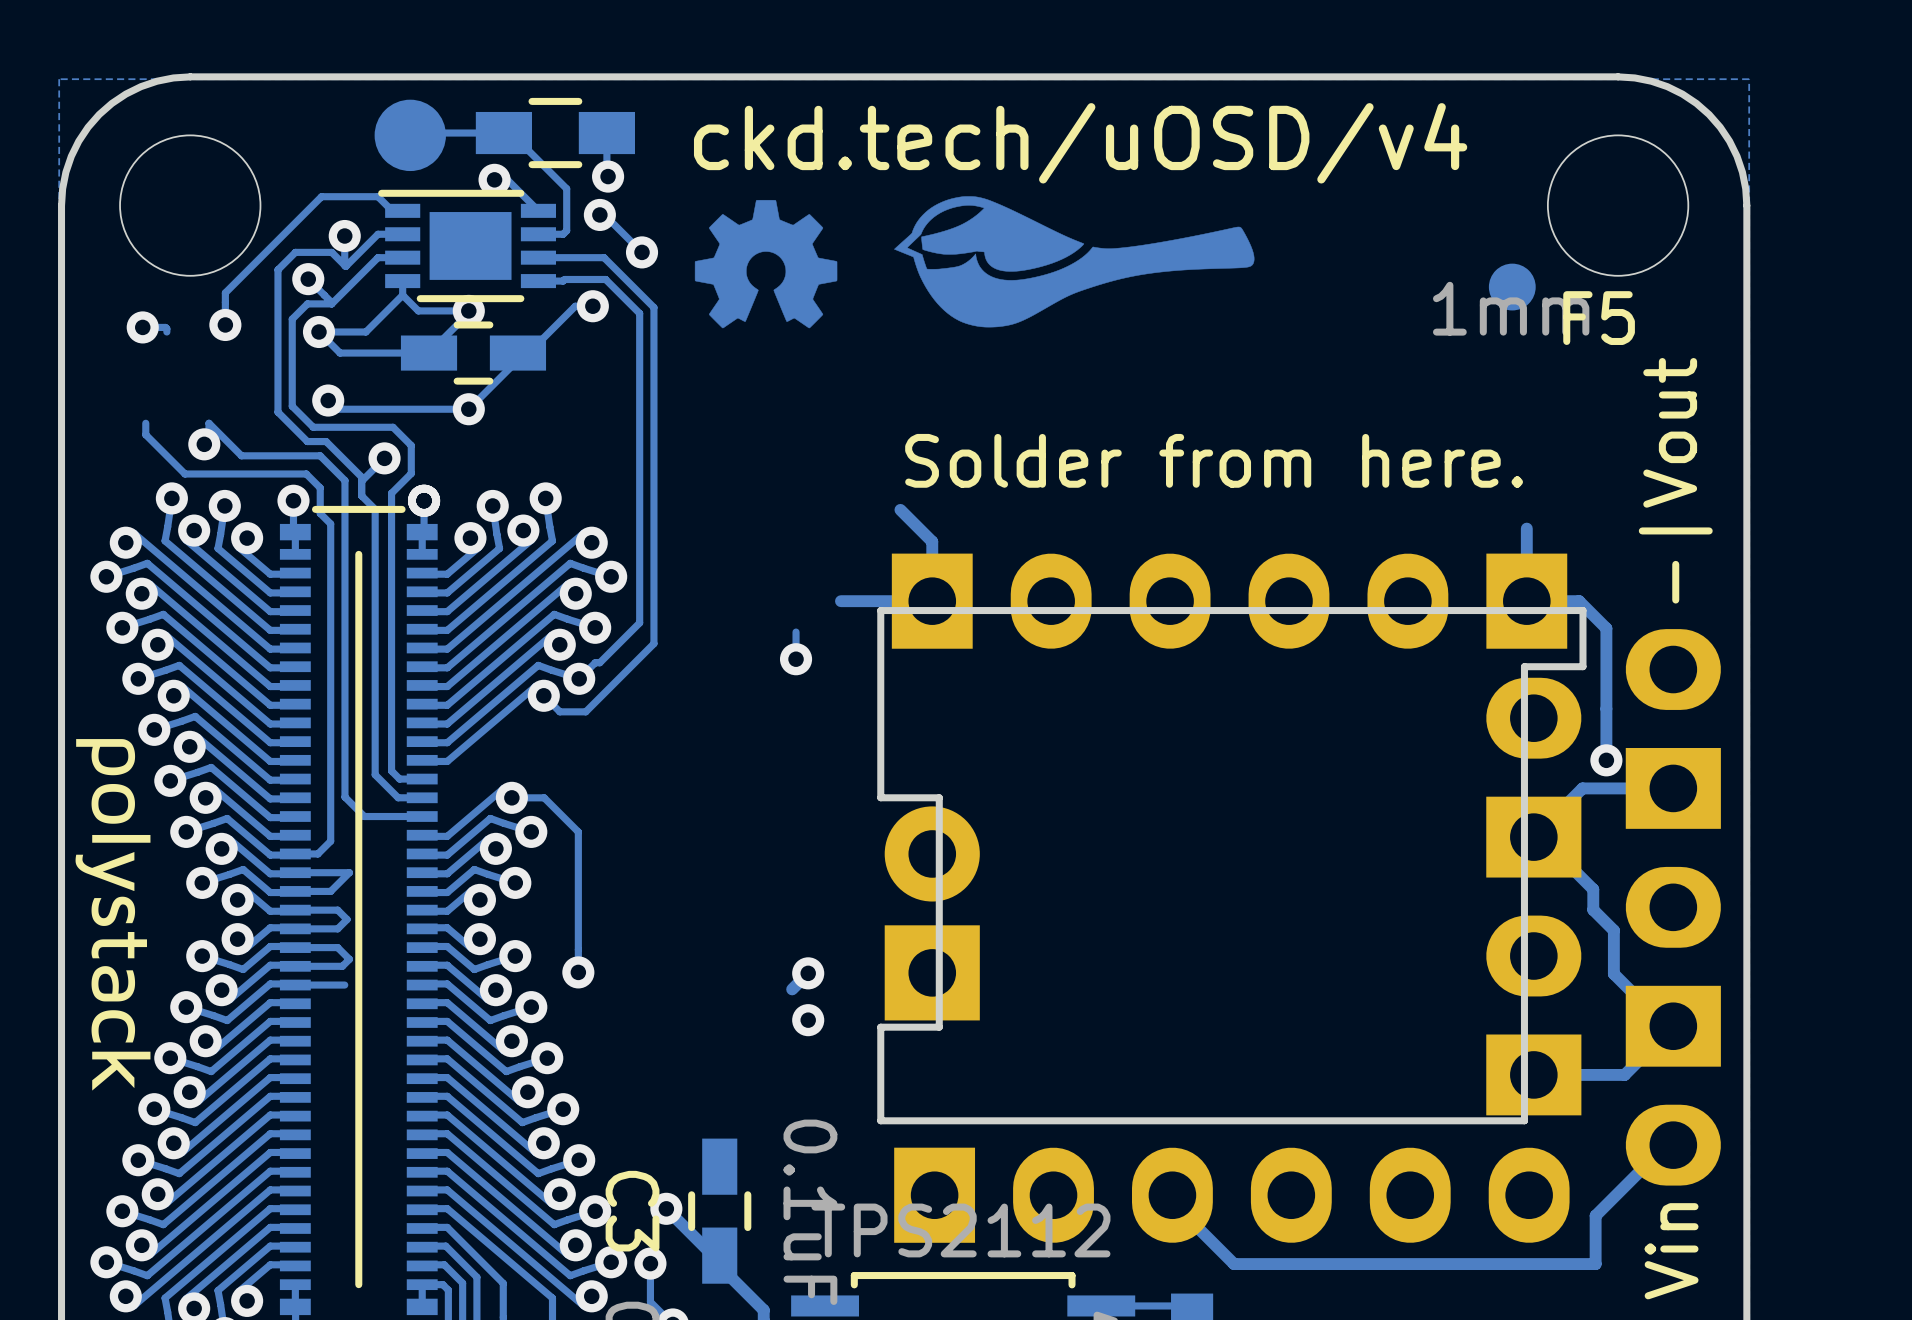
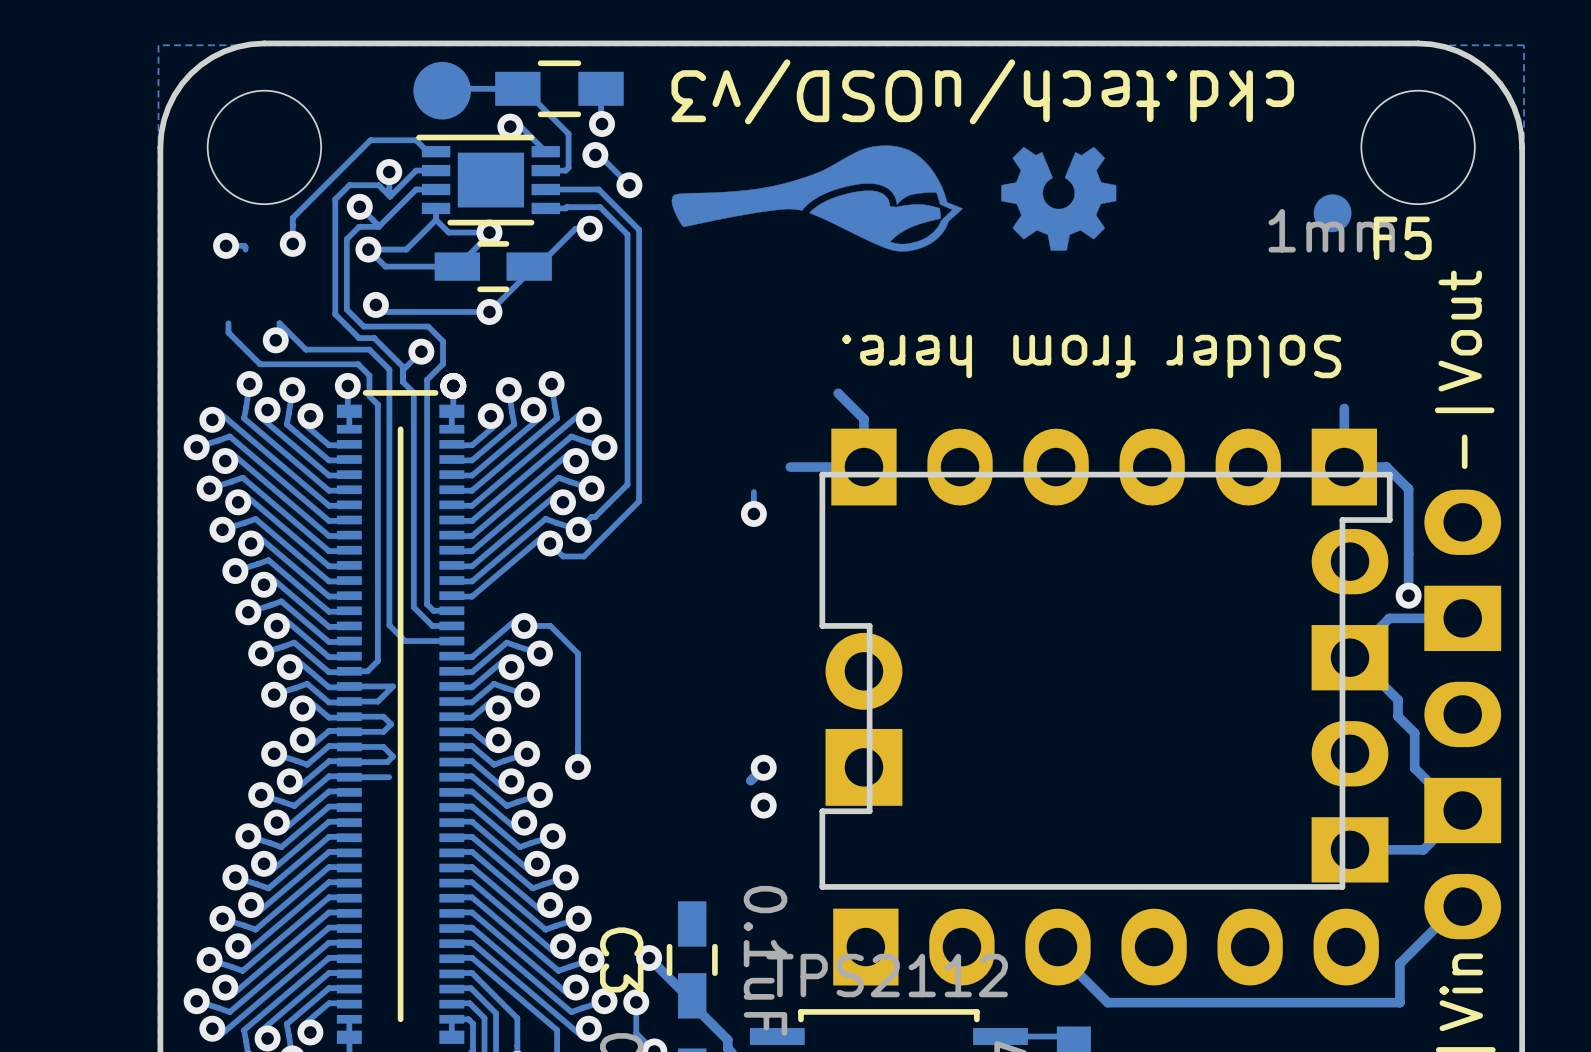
text: ckd.tech/uOSD/v4 (1080, 143) -> ckd.tech/uOSD/v3 (982, 91)
drawing: [894, 196, 1255, 328] -> none
drawing: [694, 199, 838, 329] -> none
drawing: none -> [671, 145, 1117, 252]
text rotation: 0° (1214, 460) -> 180° (1091, 356)
drawing: [75, 739, 151, 1091] -> none

